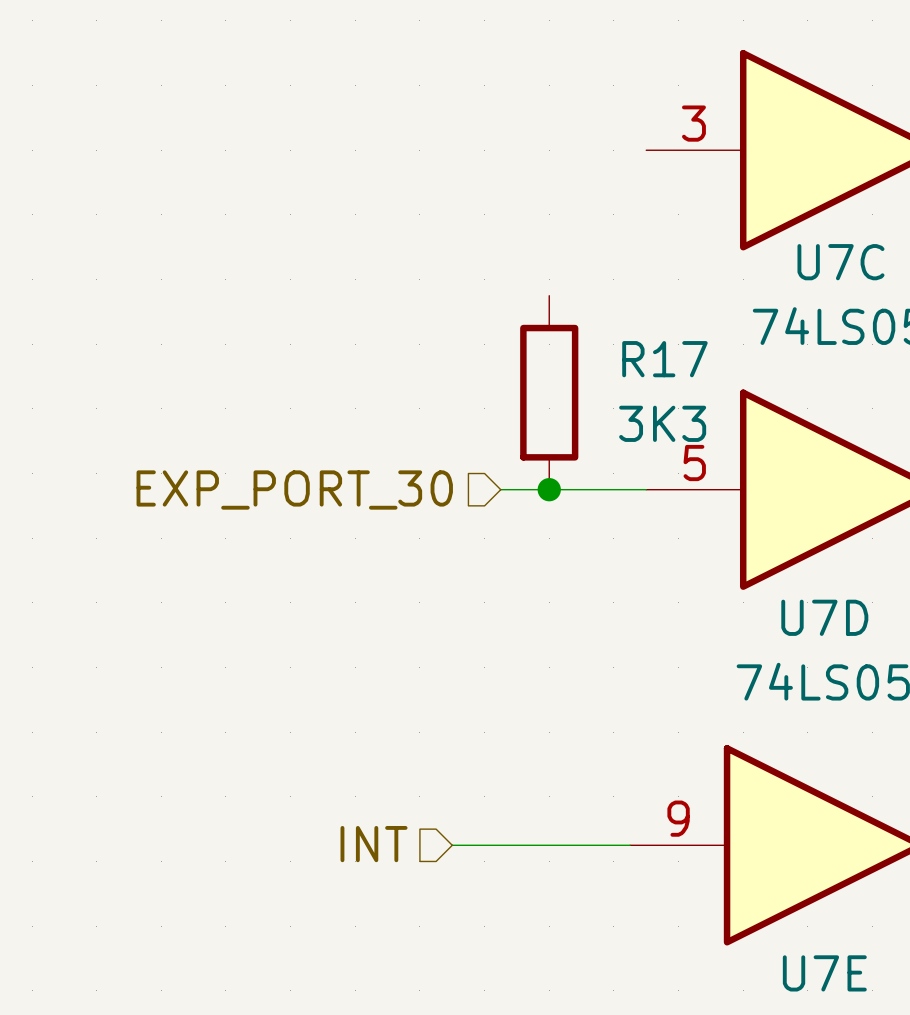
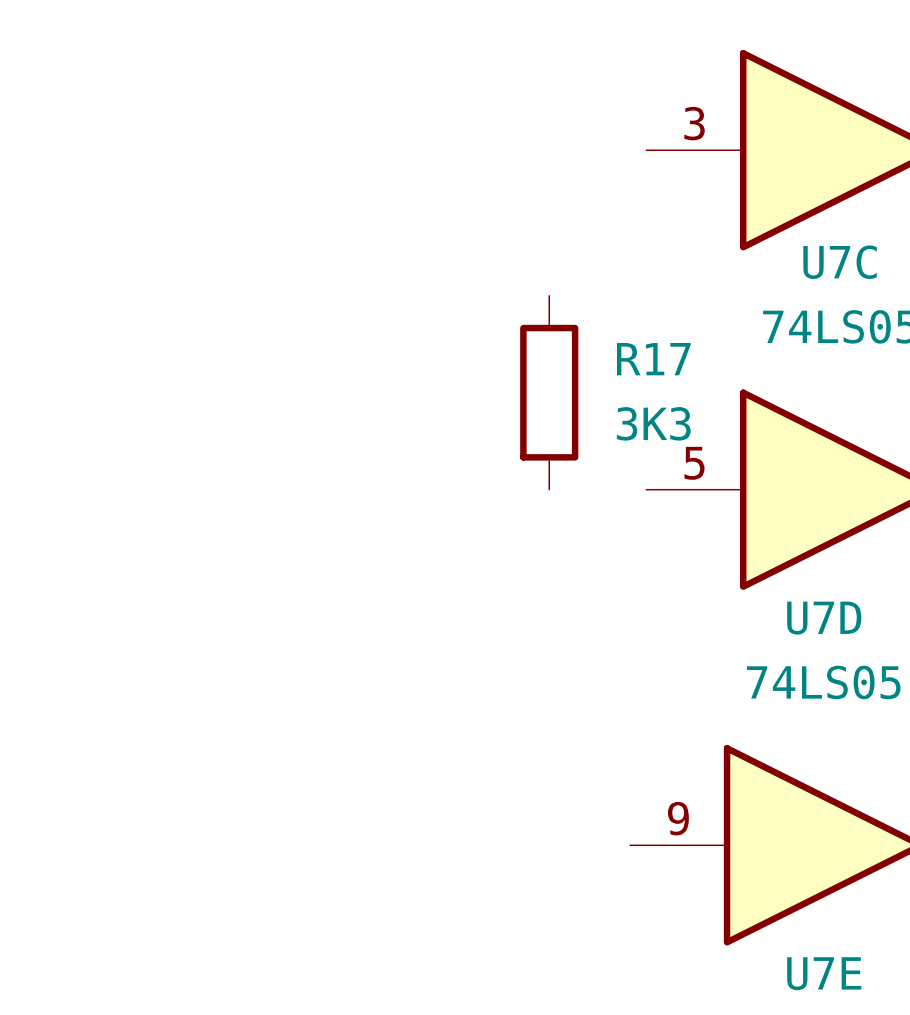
wire: (500, 489) (646, 489) -> none
junction: (549, 489) -> none
hierarchical label: EXP_PORT_30 (294, 490) -> none
hierarchical label: INT (374, 844) -> none
wire: (452, 845) (630, 845) -> none

